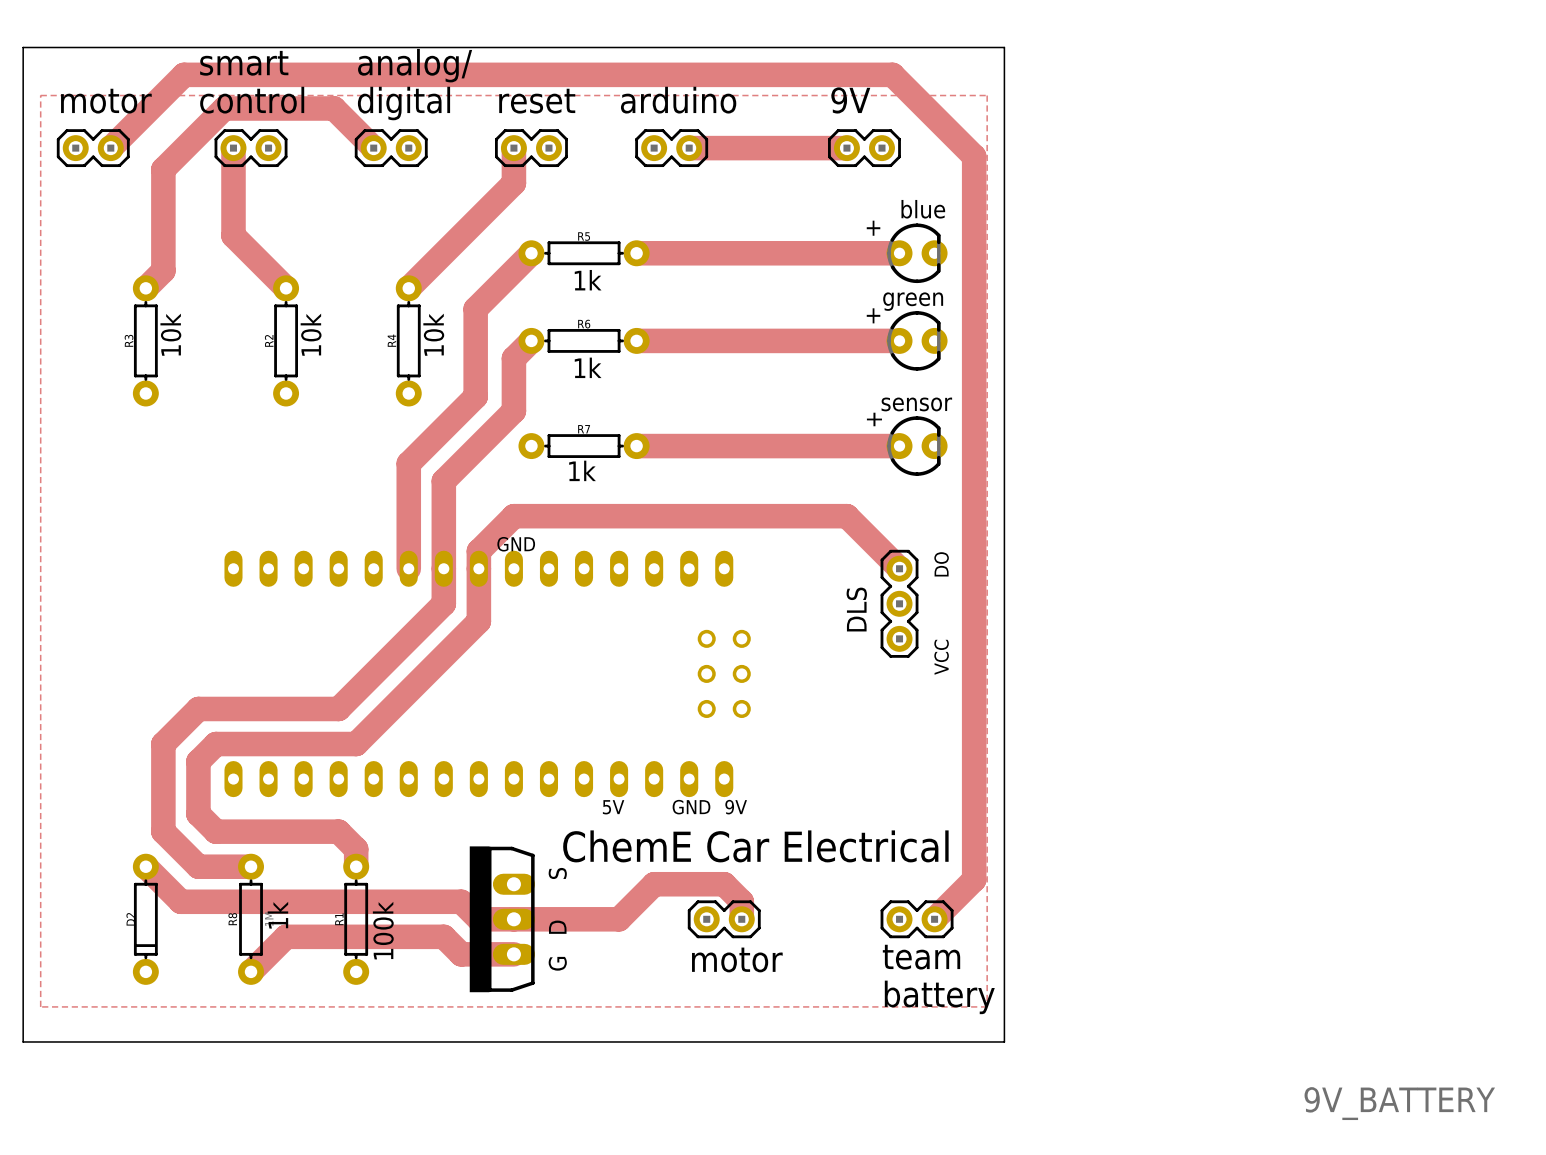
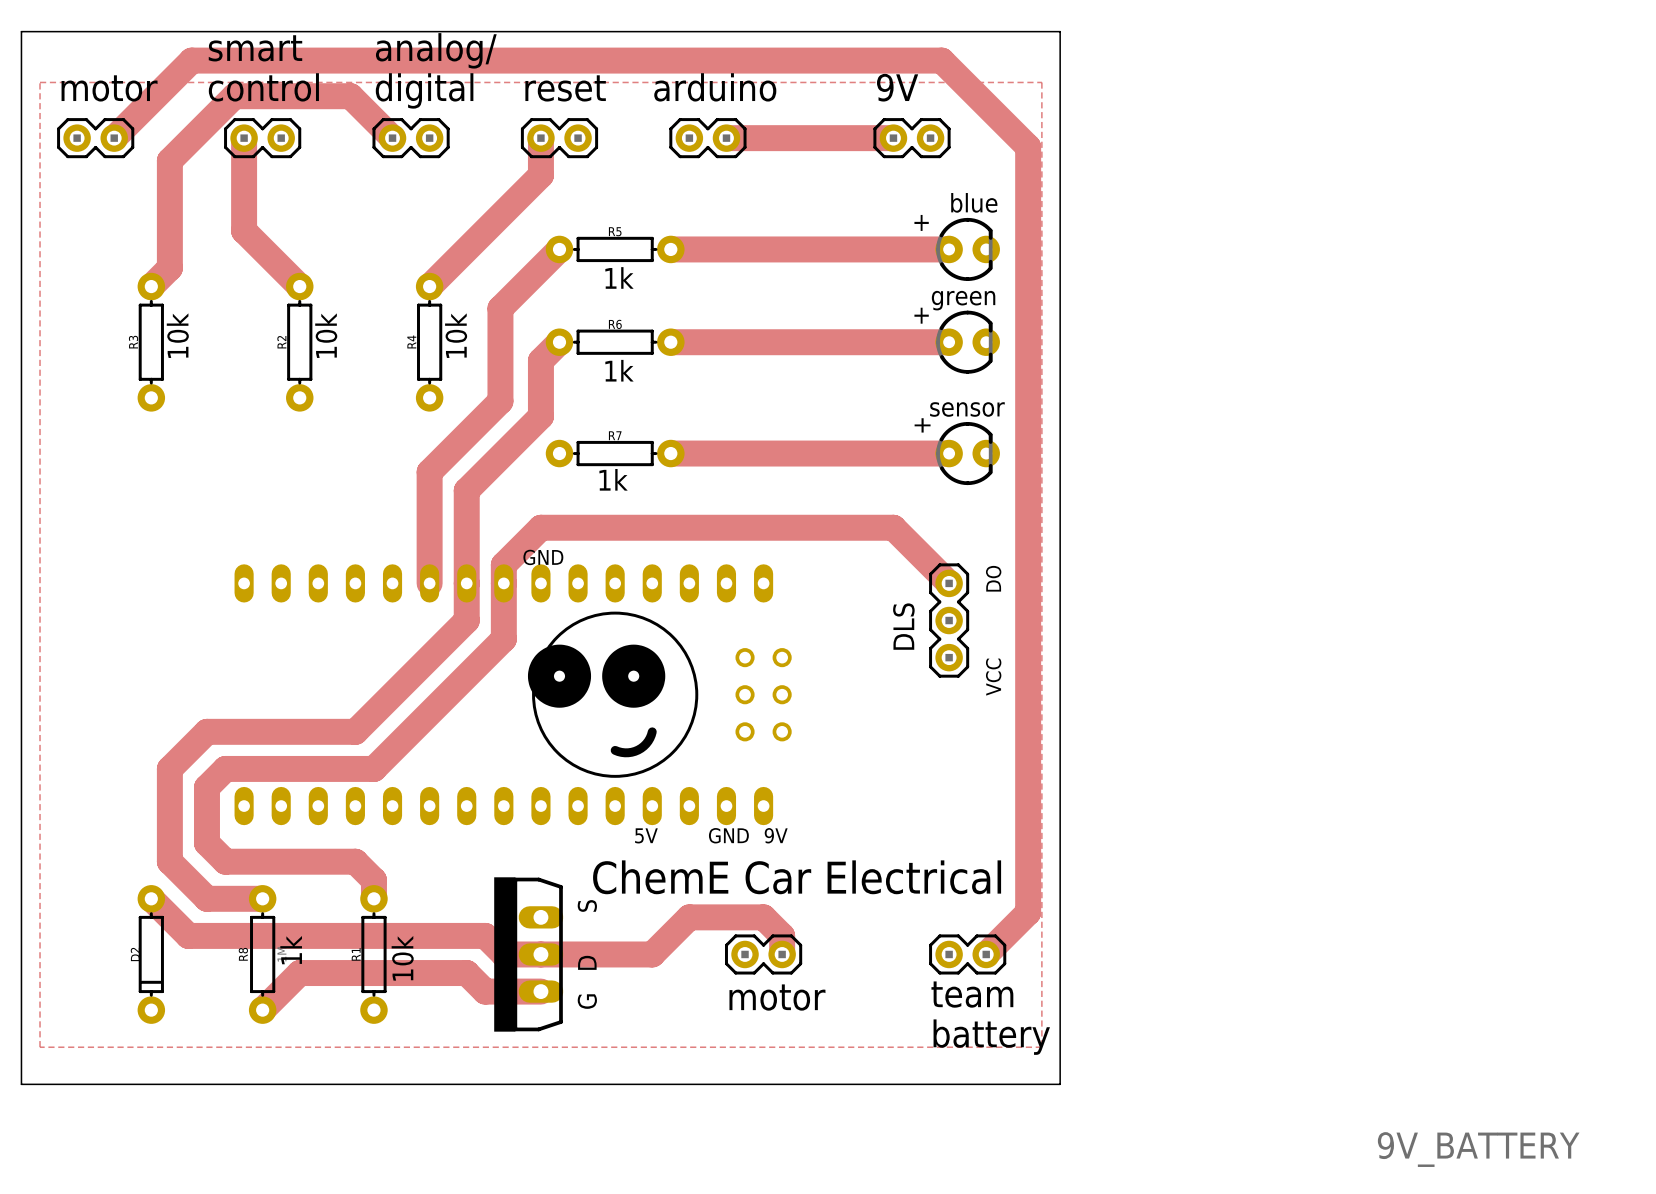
drawing: none -> [527, 611, 699, 778]
line: none -> (652, 731) (648, 741) (638, 750) (628, 752) (615, 750)
text: 100k (383, 930) -> 10k (402, 958)

